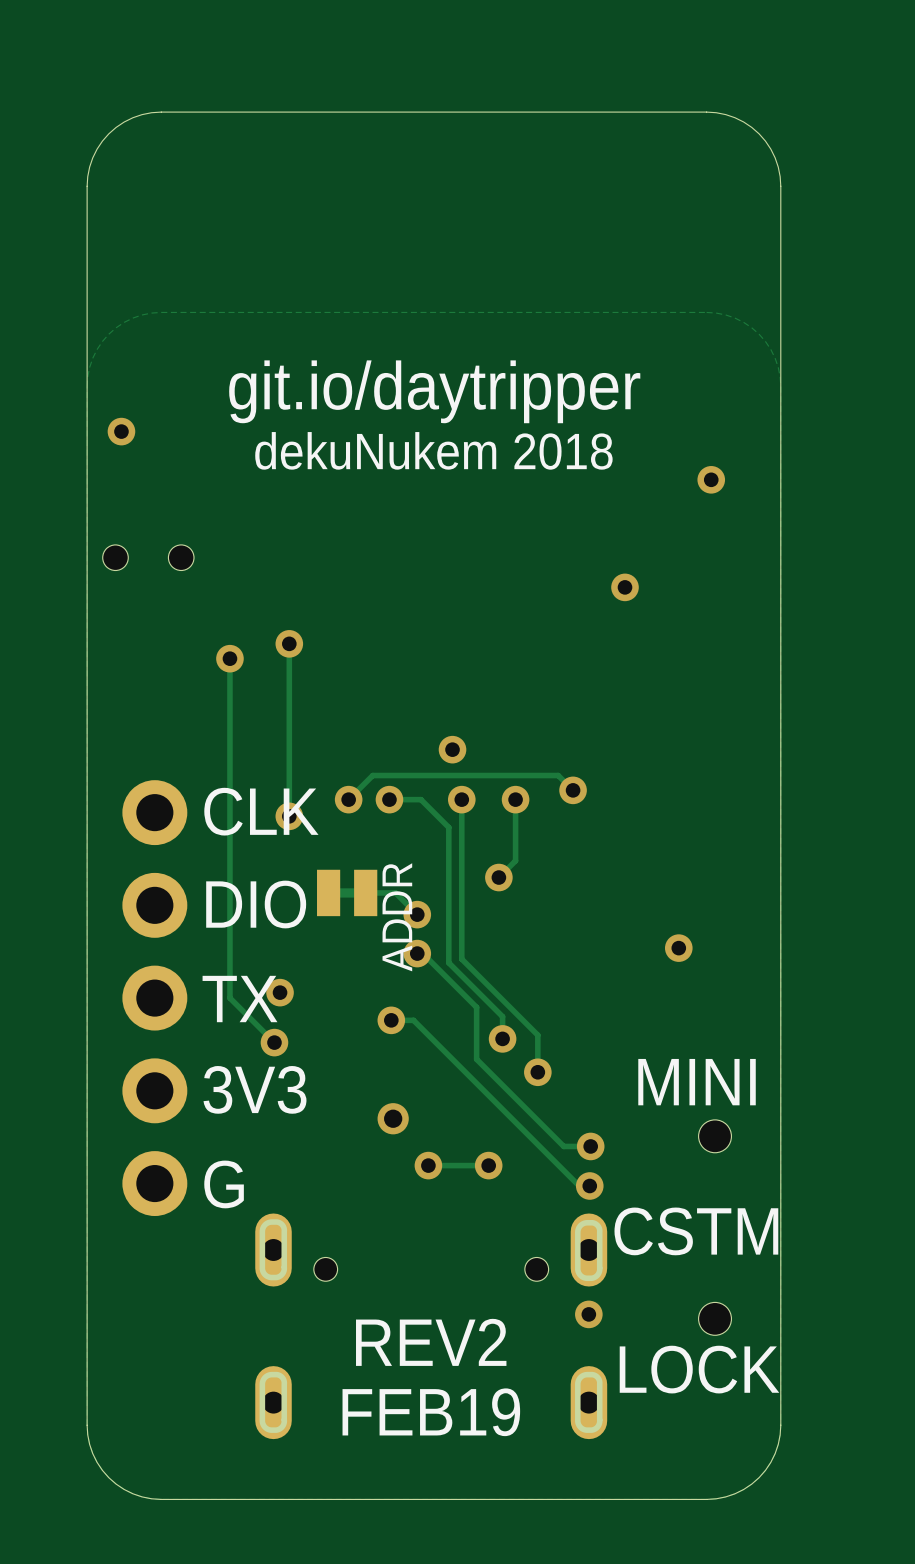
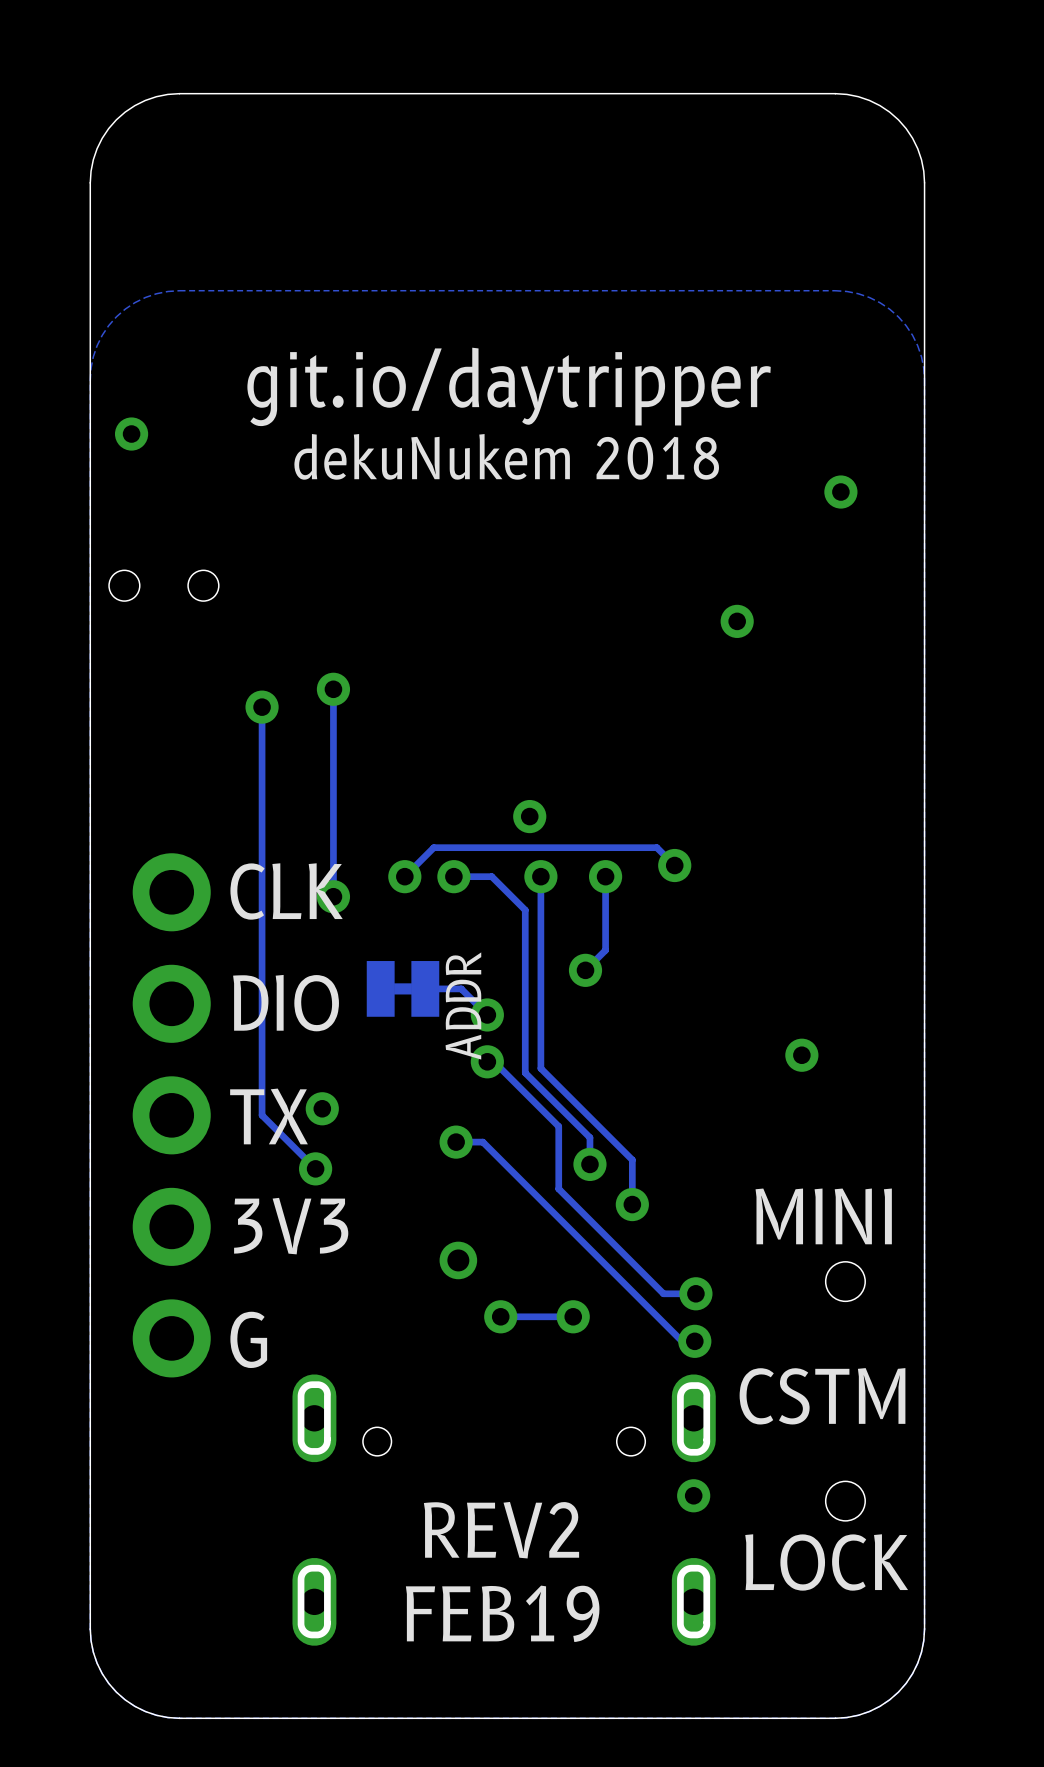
board edge: (780, 222) (780, 176) (775, 157) (765, 141) (743, 122) (725, 114) (706, 112) (151, 112) (124, 122) (108, 133) (97, 149) (87, 176) (87, 222) -> (924, 182) (921, 159) (917, 148) (912, 138) (898, 119) (879, 105) (869, 100) (858, 96) (835, 93) (167, 94) (156, 96) (134, 105) (125, 112) (108, 128) (102, 138) (93, 159) (90, 182)

